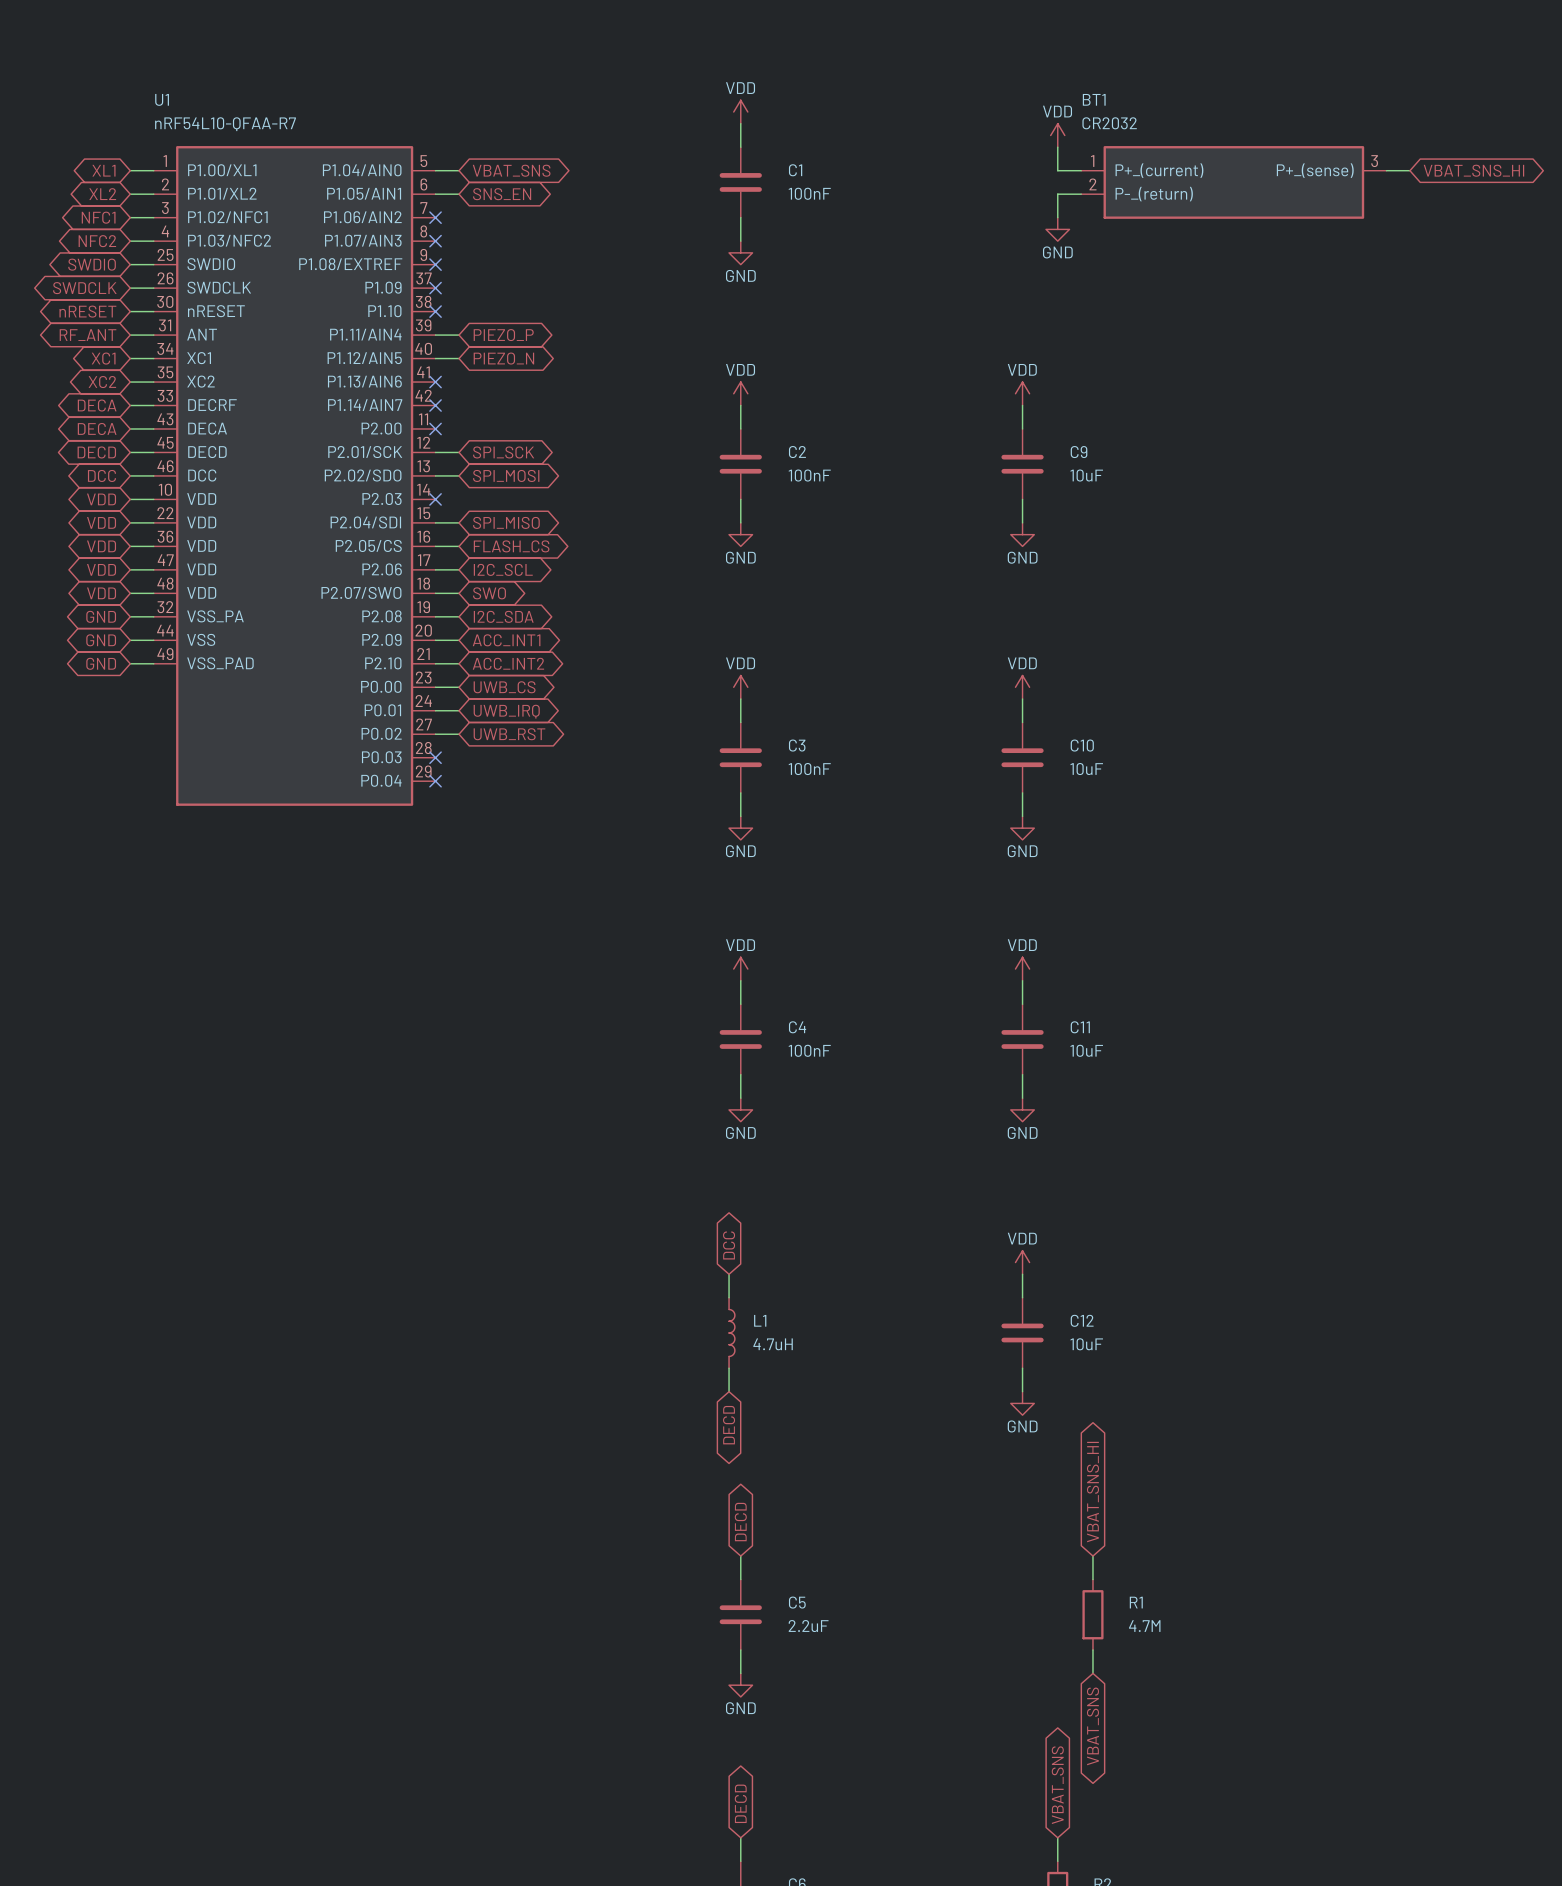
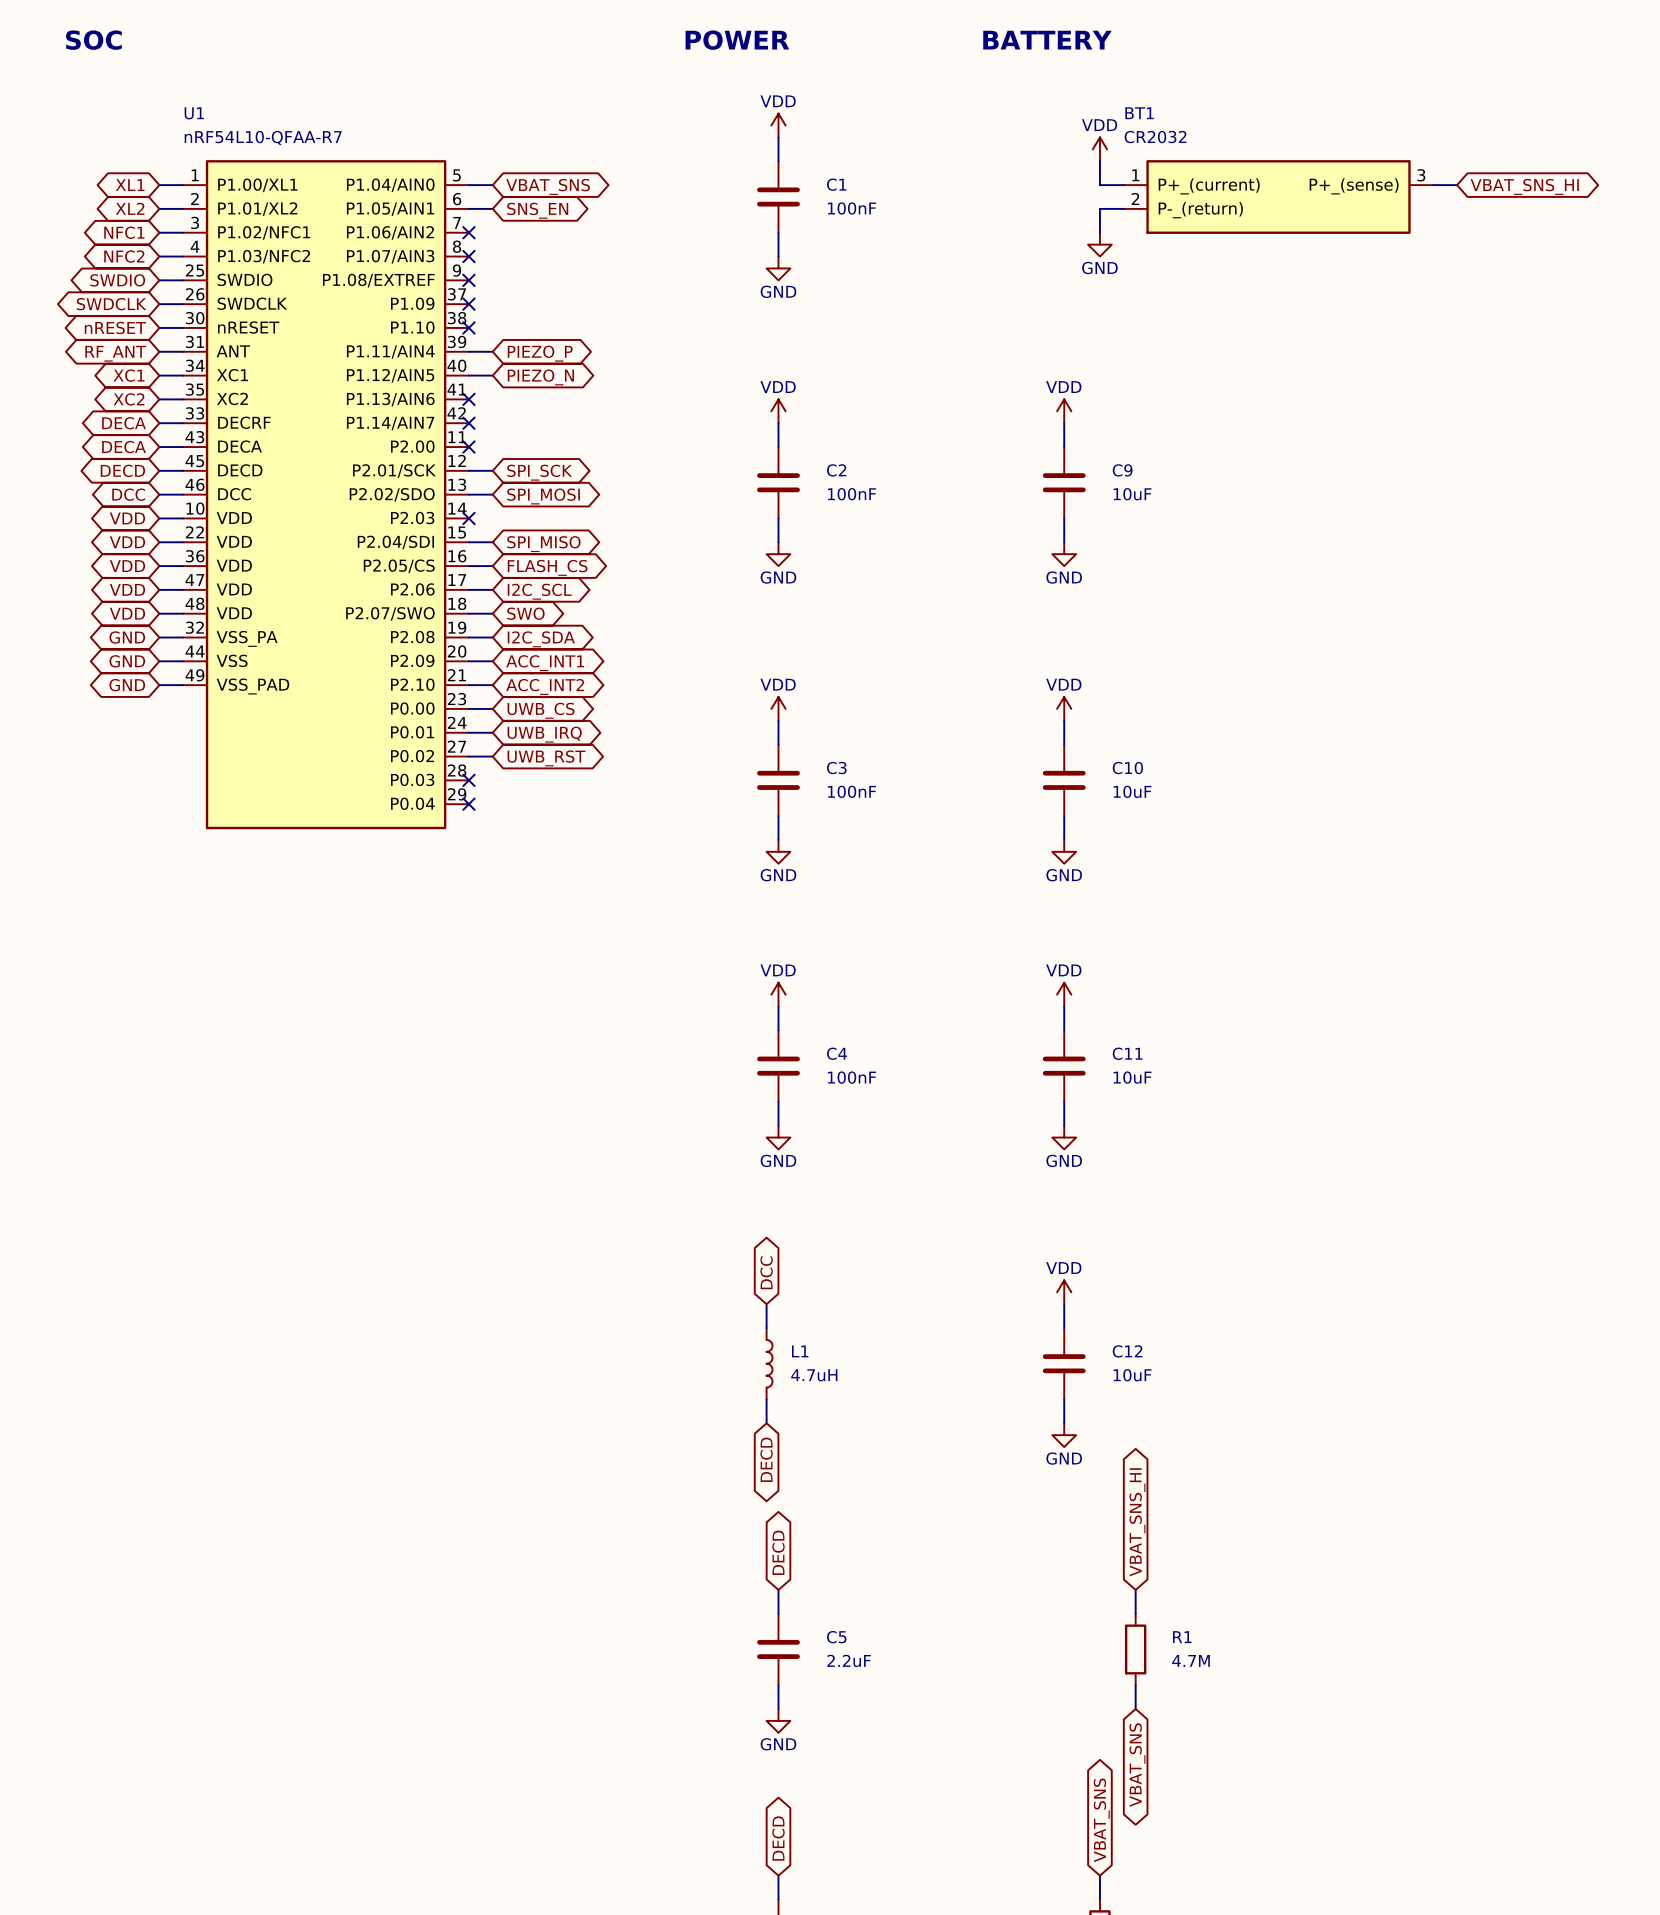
text: none -> SOC (93, 40)
text: none -> POWER (737, 40)
text: none -> BATTERY (1047, 40)

